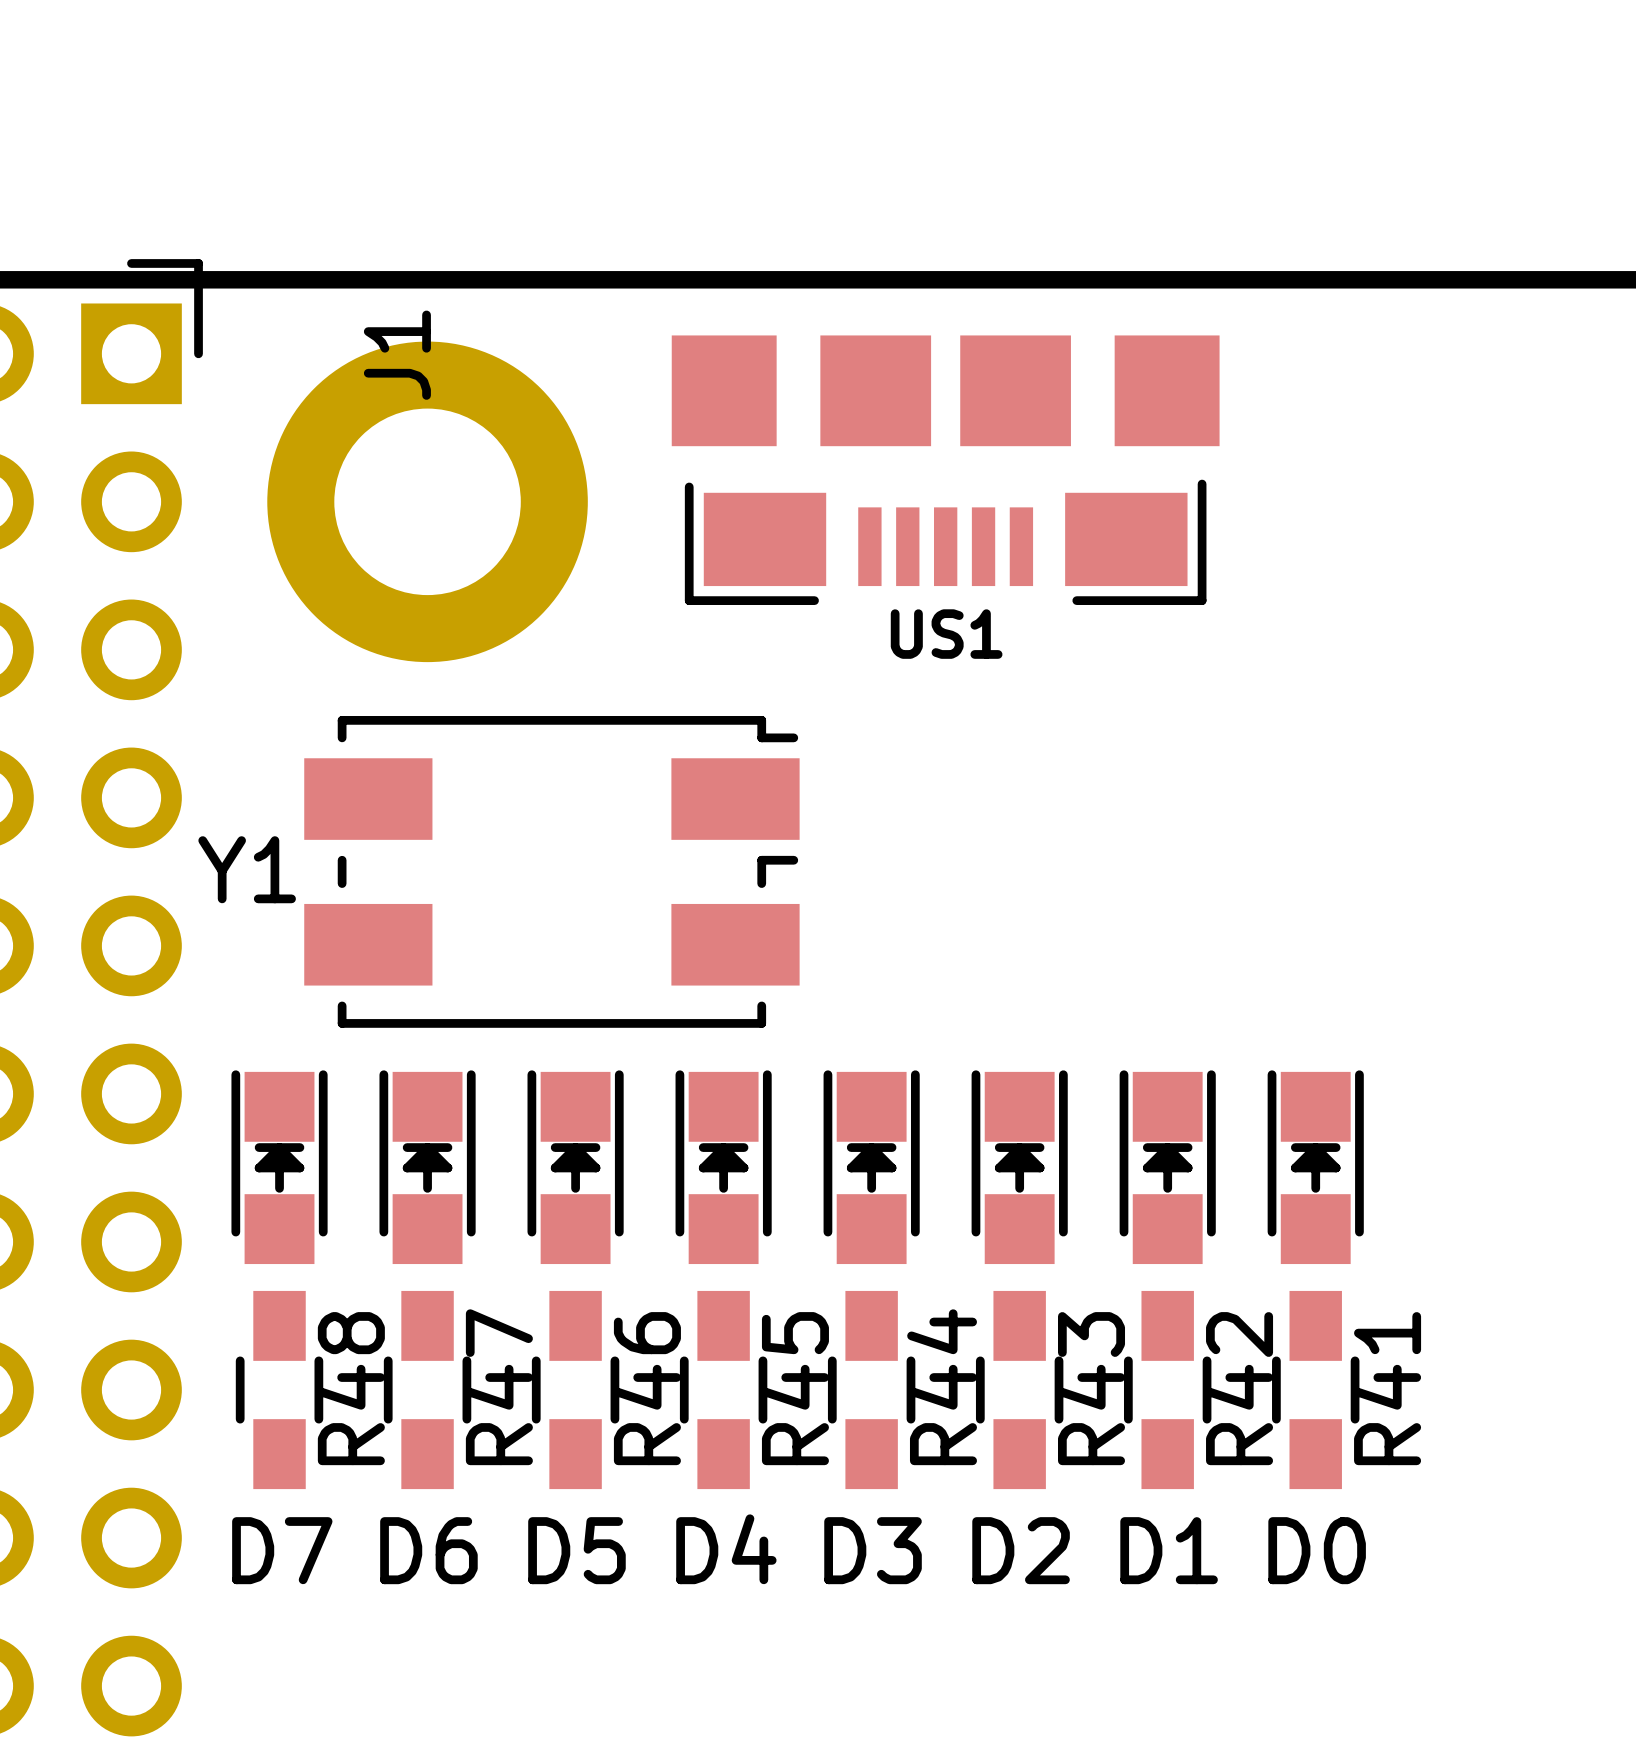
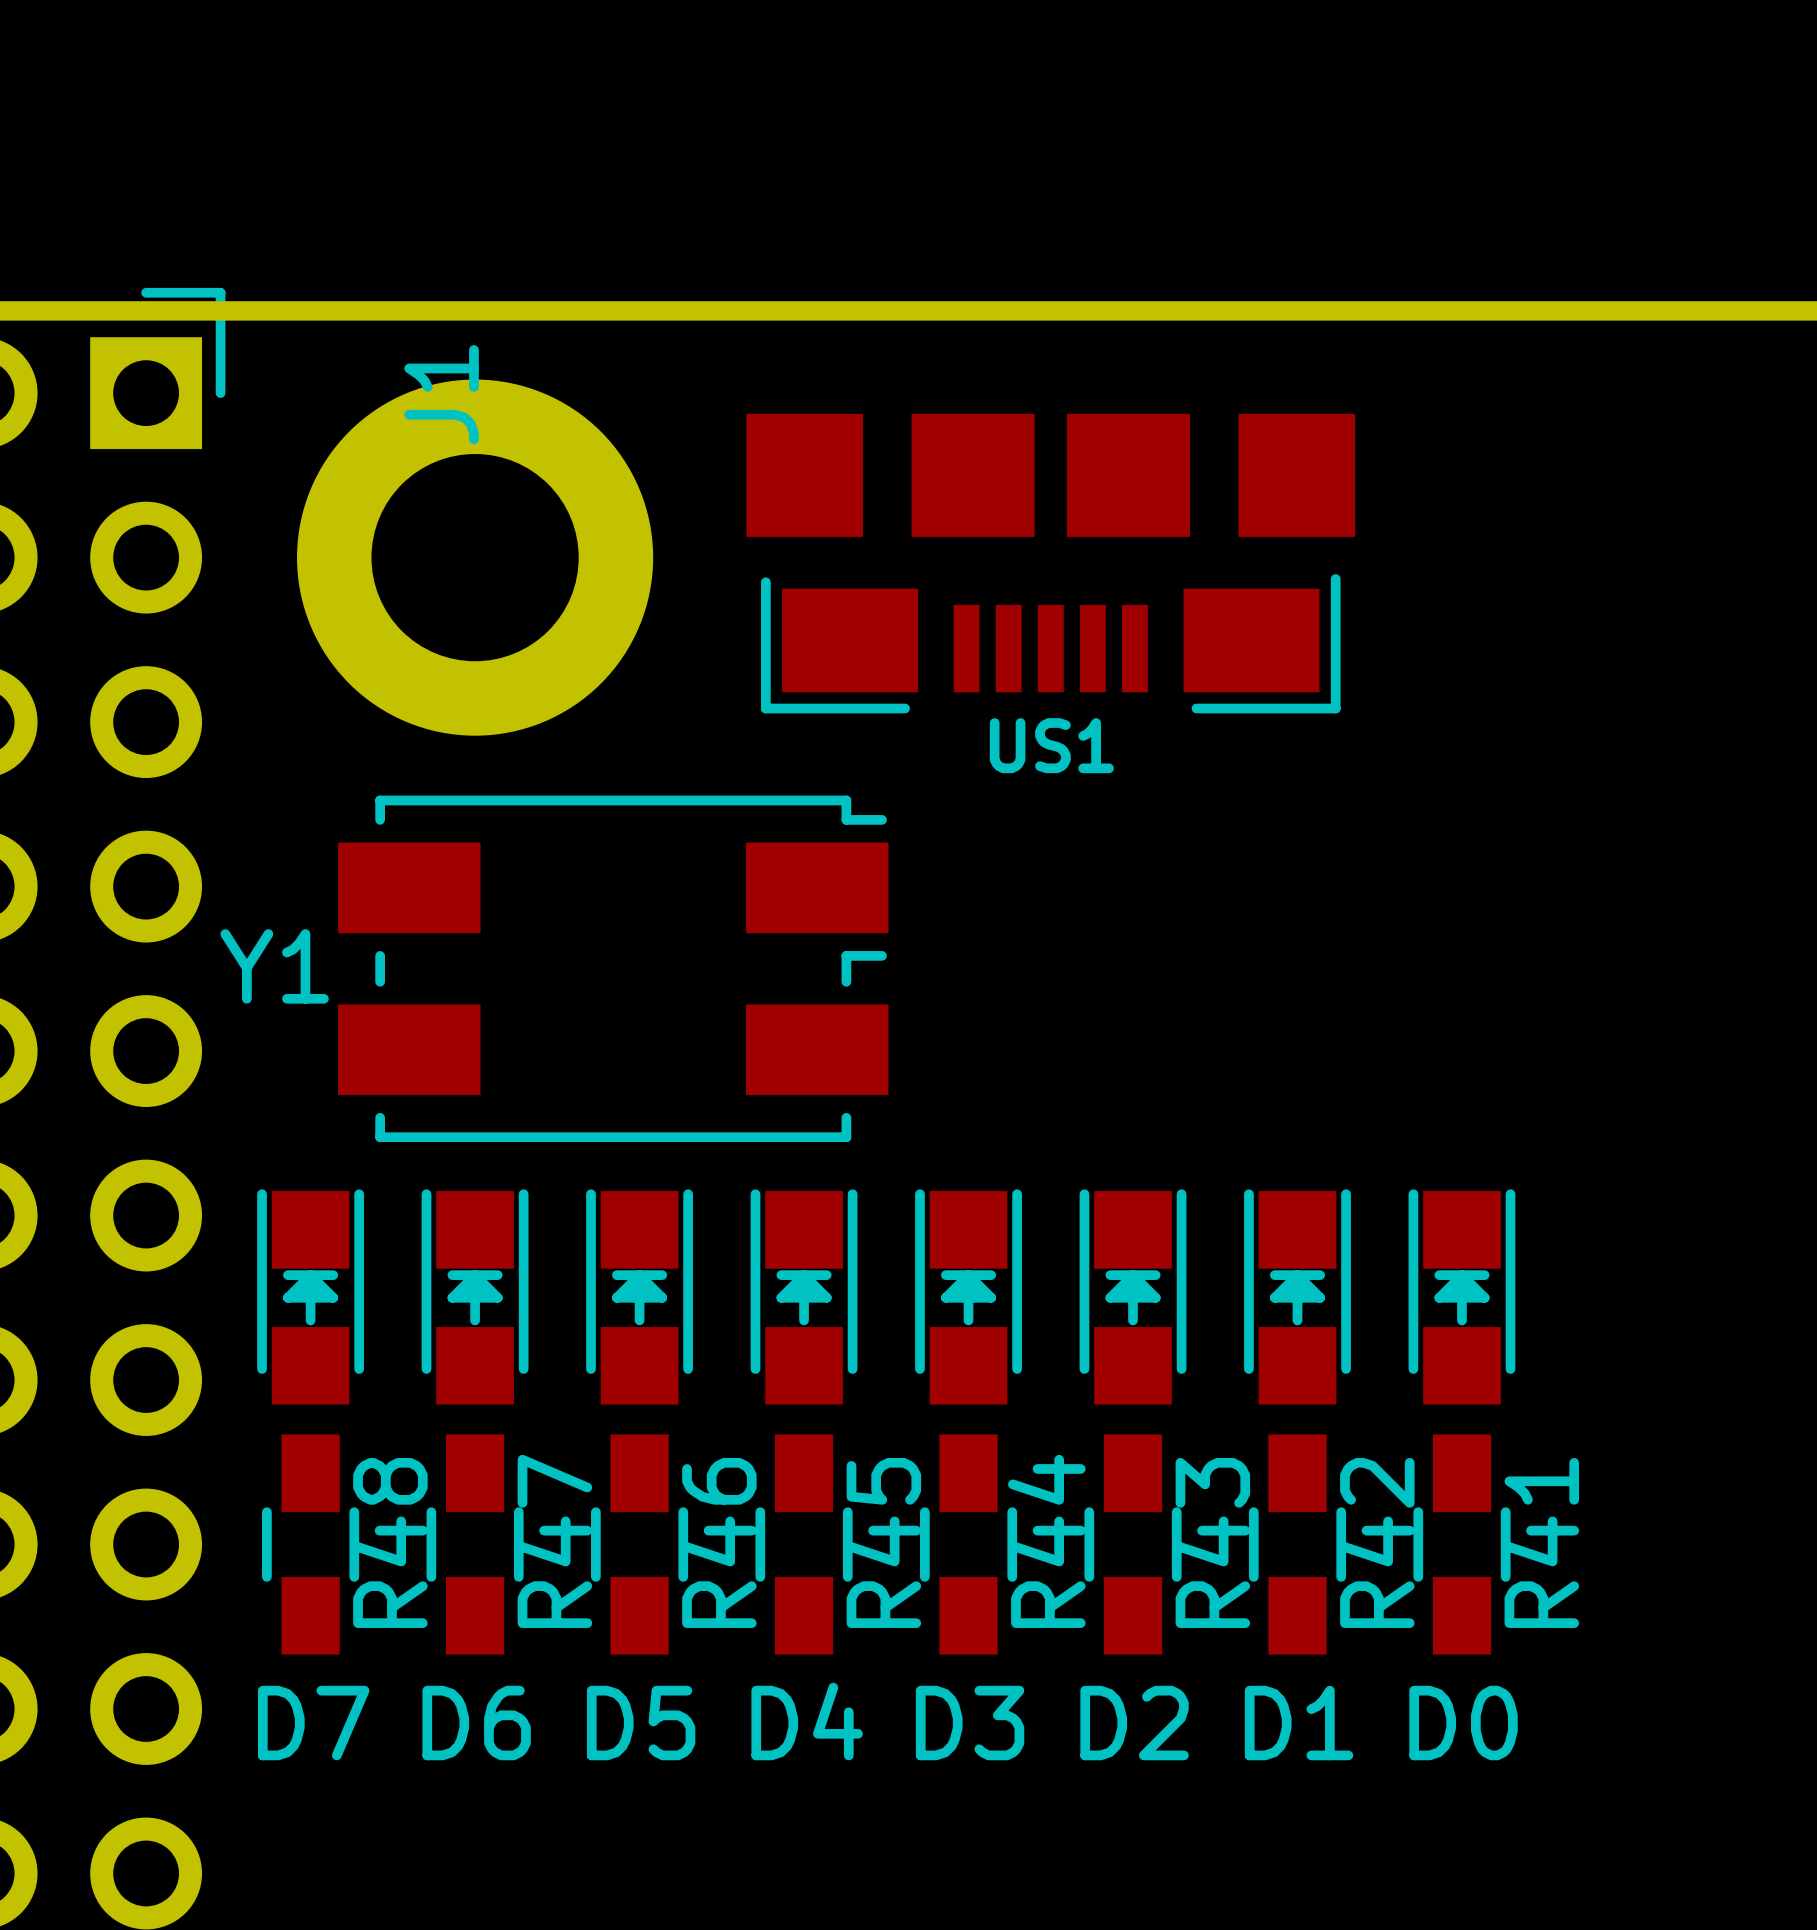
US1 position: (945, 470) -> (1050, 563)

